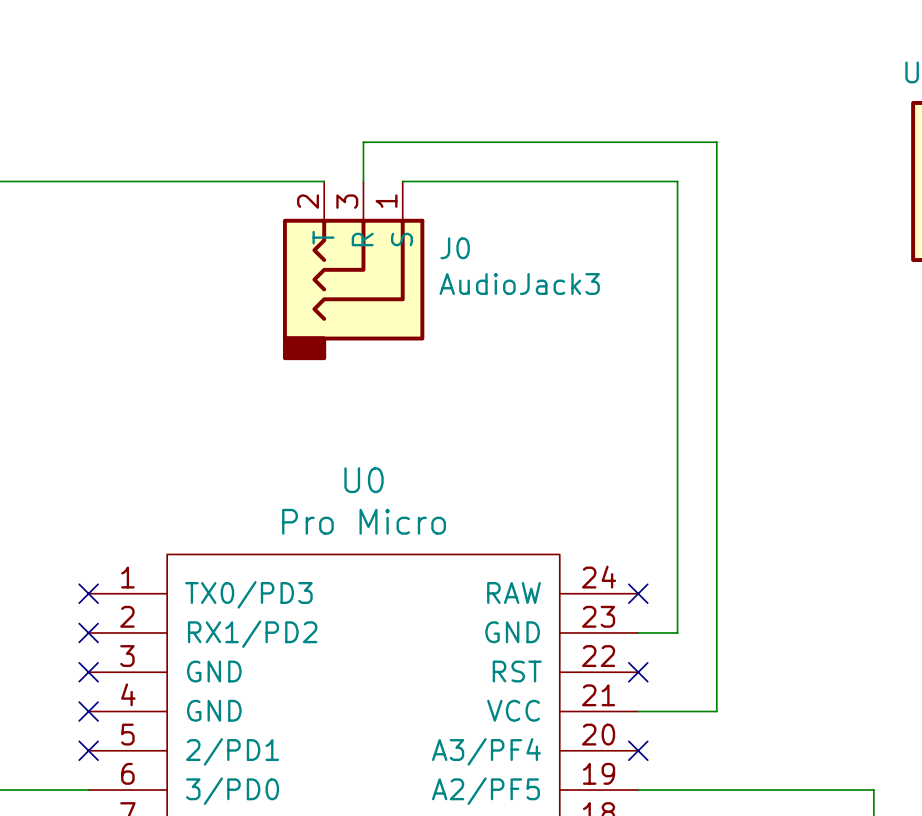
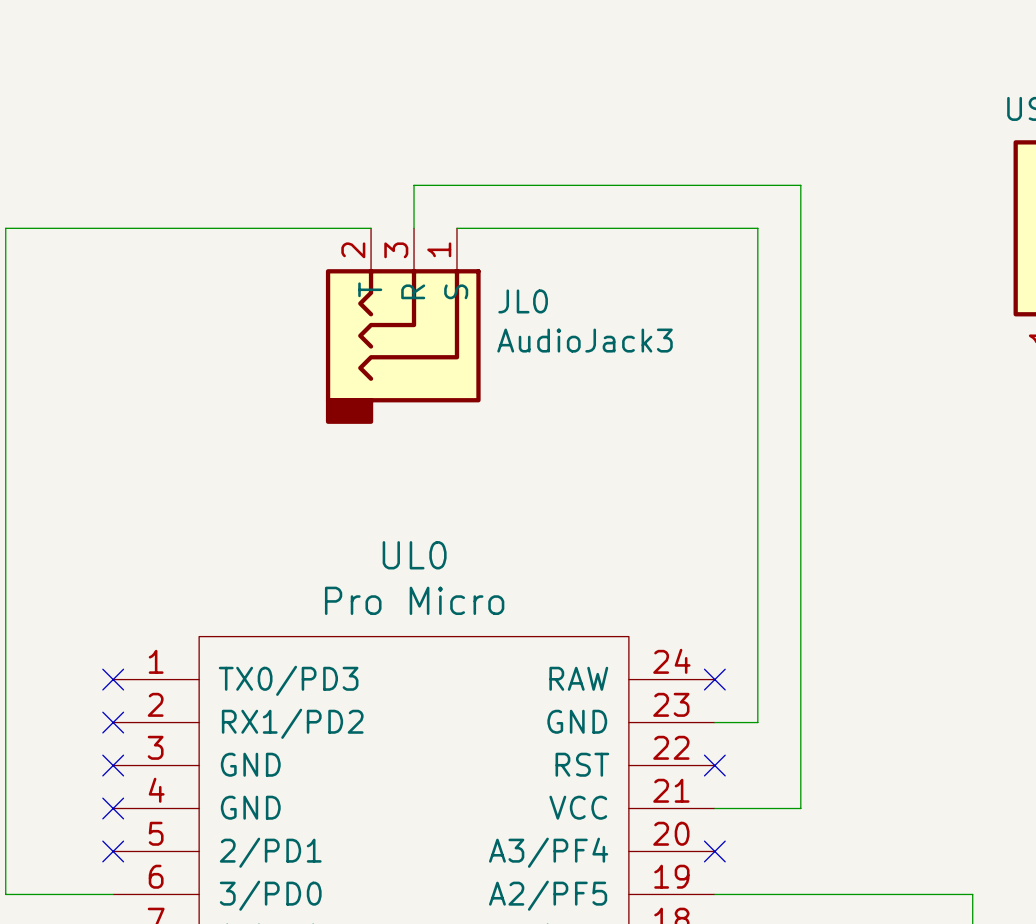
J0 name: J0 (455, 248) -> JL0 (523, 301)
U0 name: U0 (364, 480) -> UL0 (414, 555)

